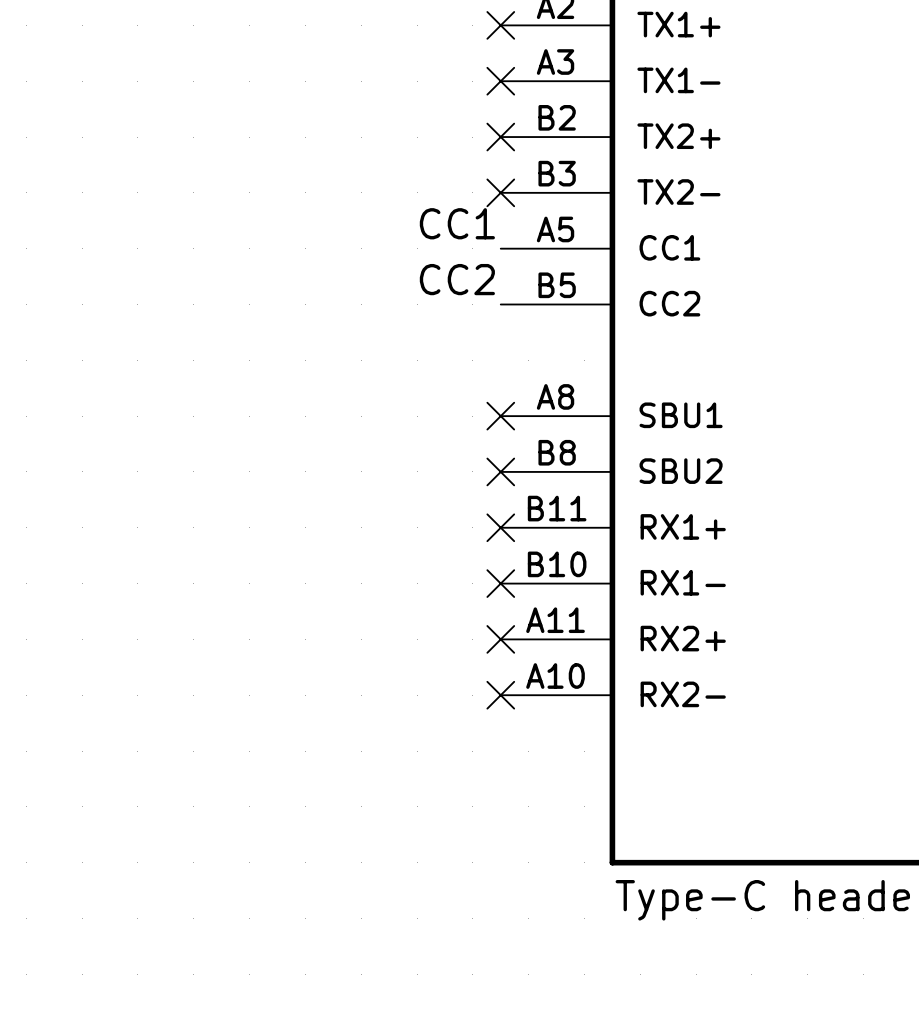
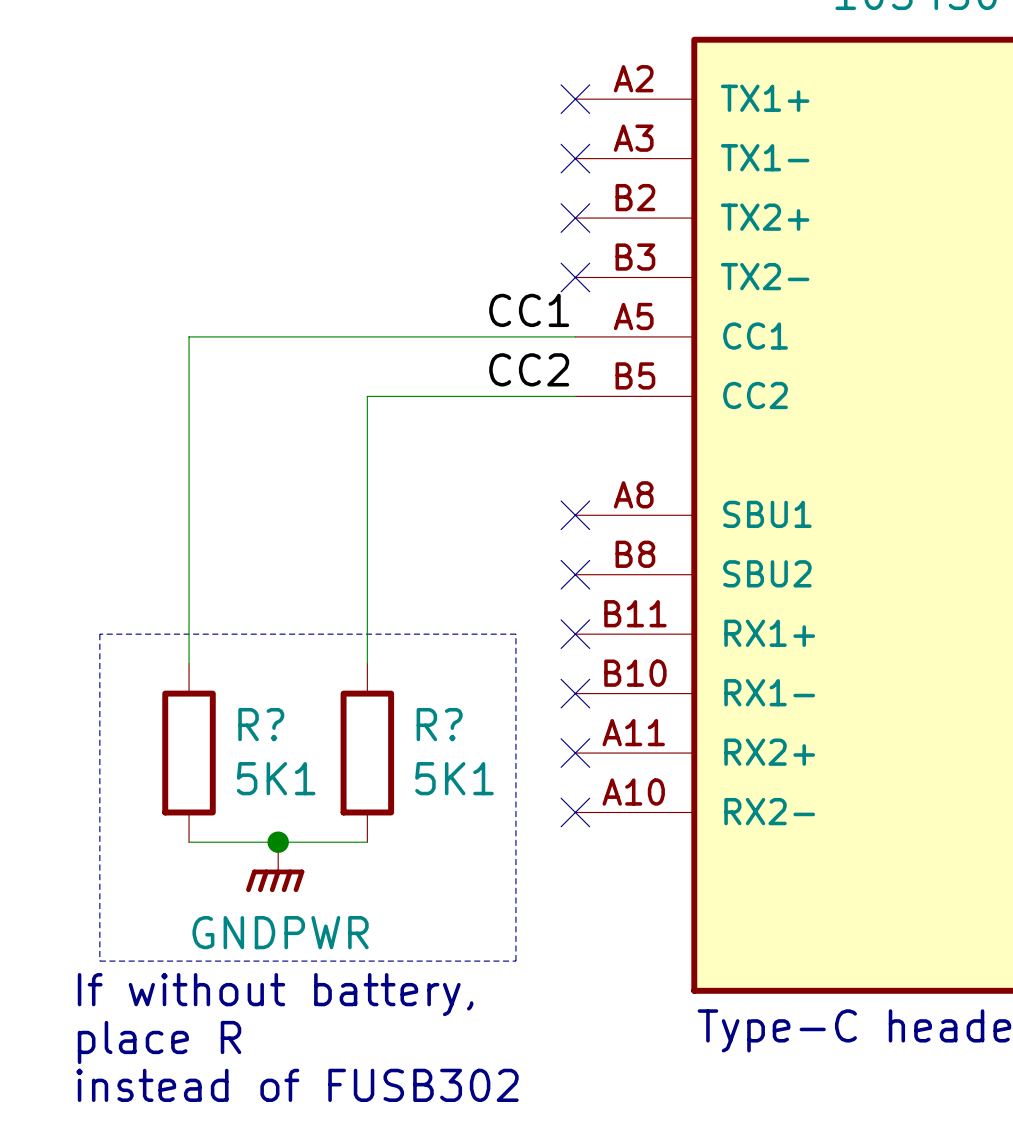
wire: none -> (575, 336) (189, 336) (189, 663)
wire: none -> (575, 396) (367, 396) (367, 663)
line: none -> (99, 634) (515, 634) (515, 961) (99, 961) (99, 634)
R?: none -> 5K1 (189, 753)
R?: none -> 5K1 (367, 753)
wire: none -> (189, 842) (367, 842)
junction: none -> (278, 842)
power symbol: none -> GNDPWR (275, 867)
text: none -> If without battery, (275, 994)
text: none -> place R (159, 1042)
text: none -> instead of FUSB302 (297, 1085)

